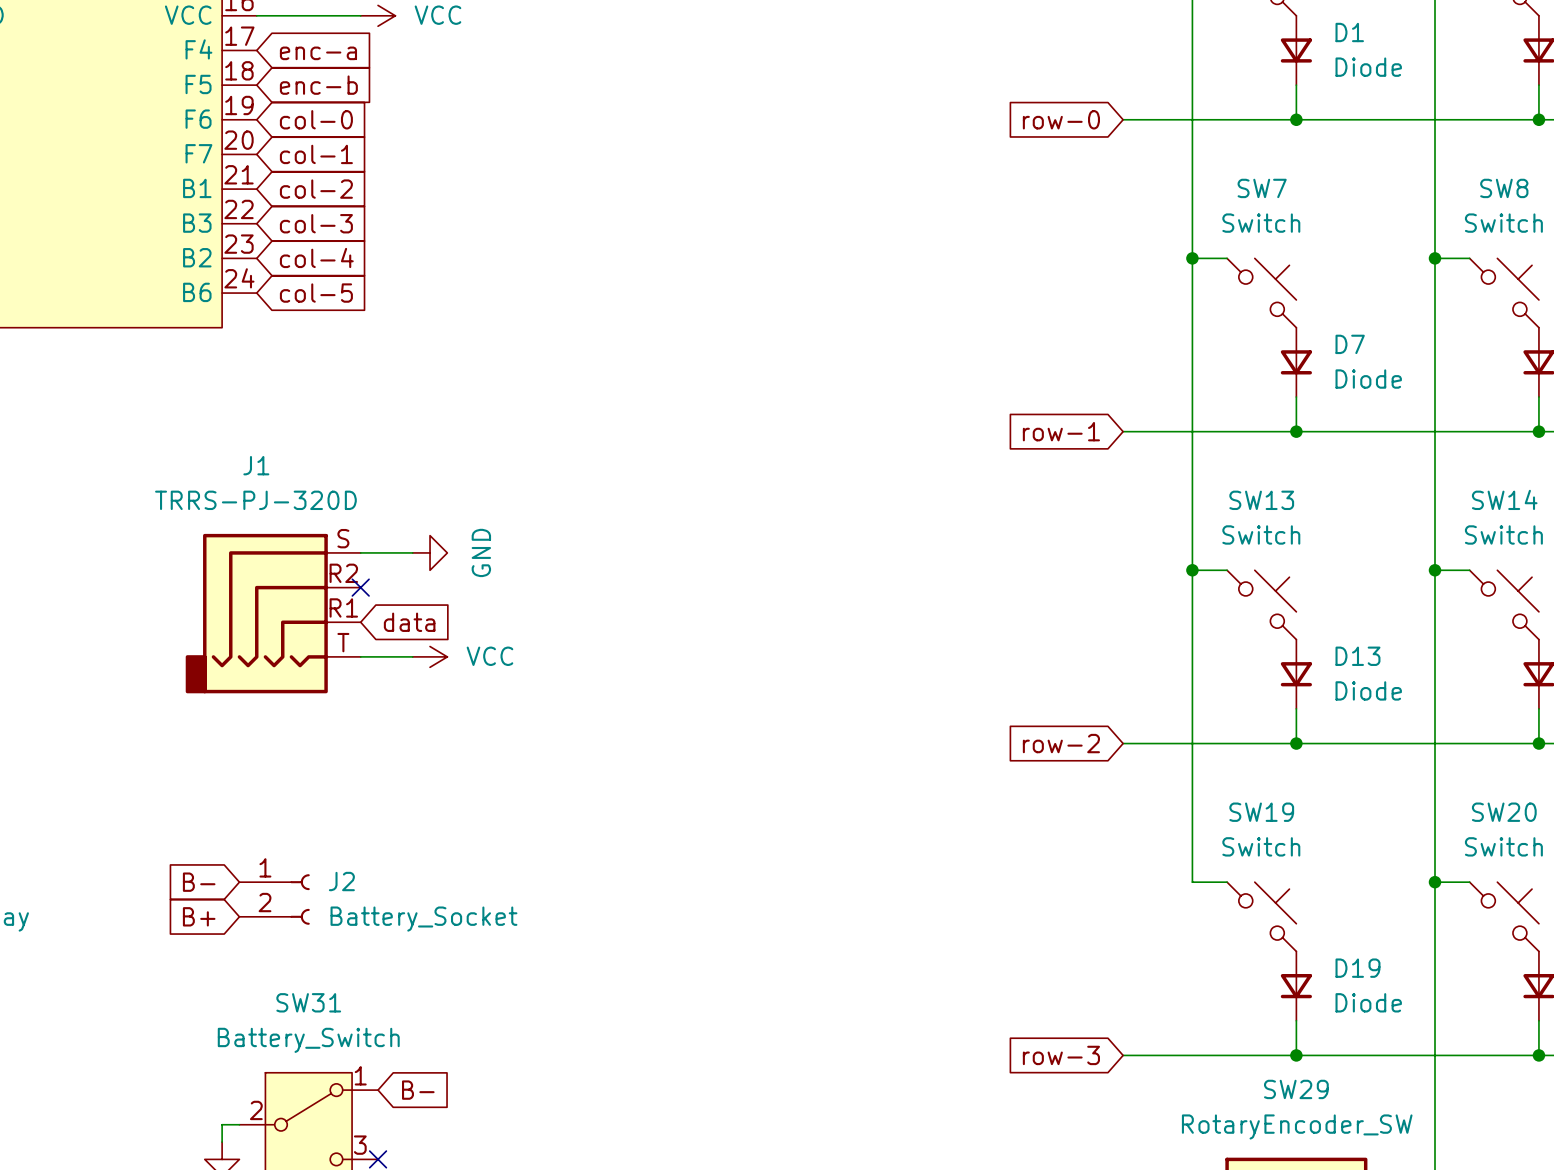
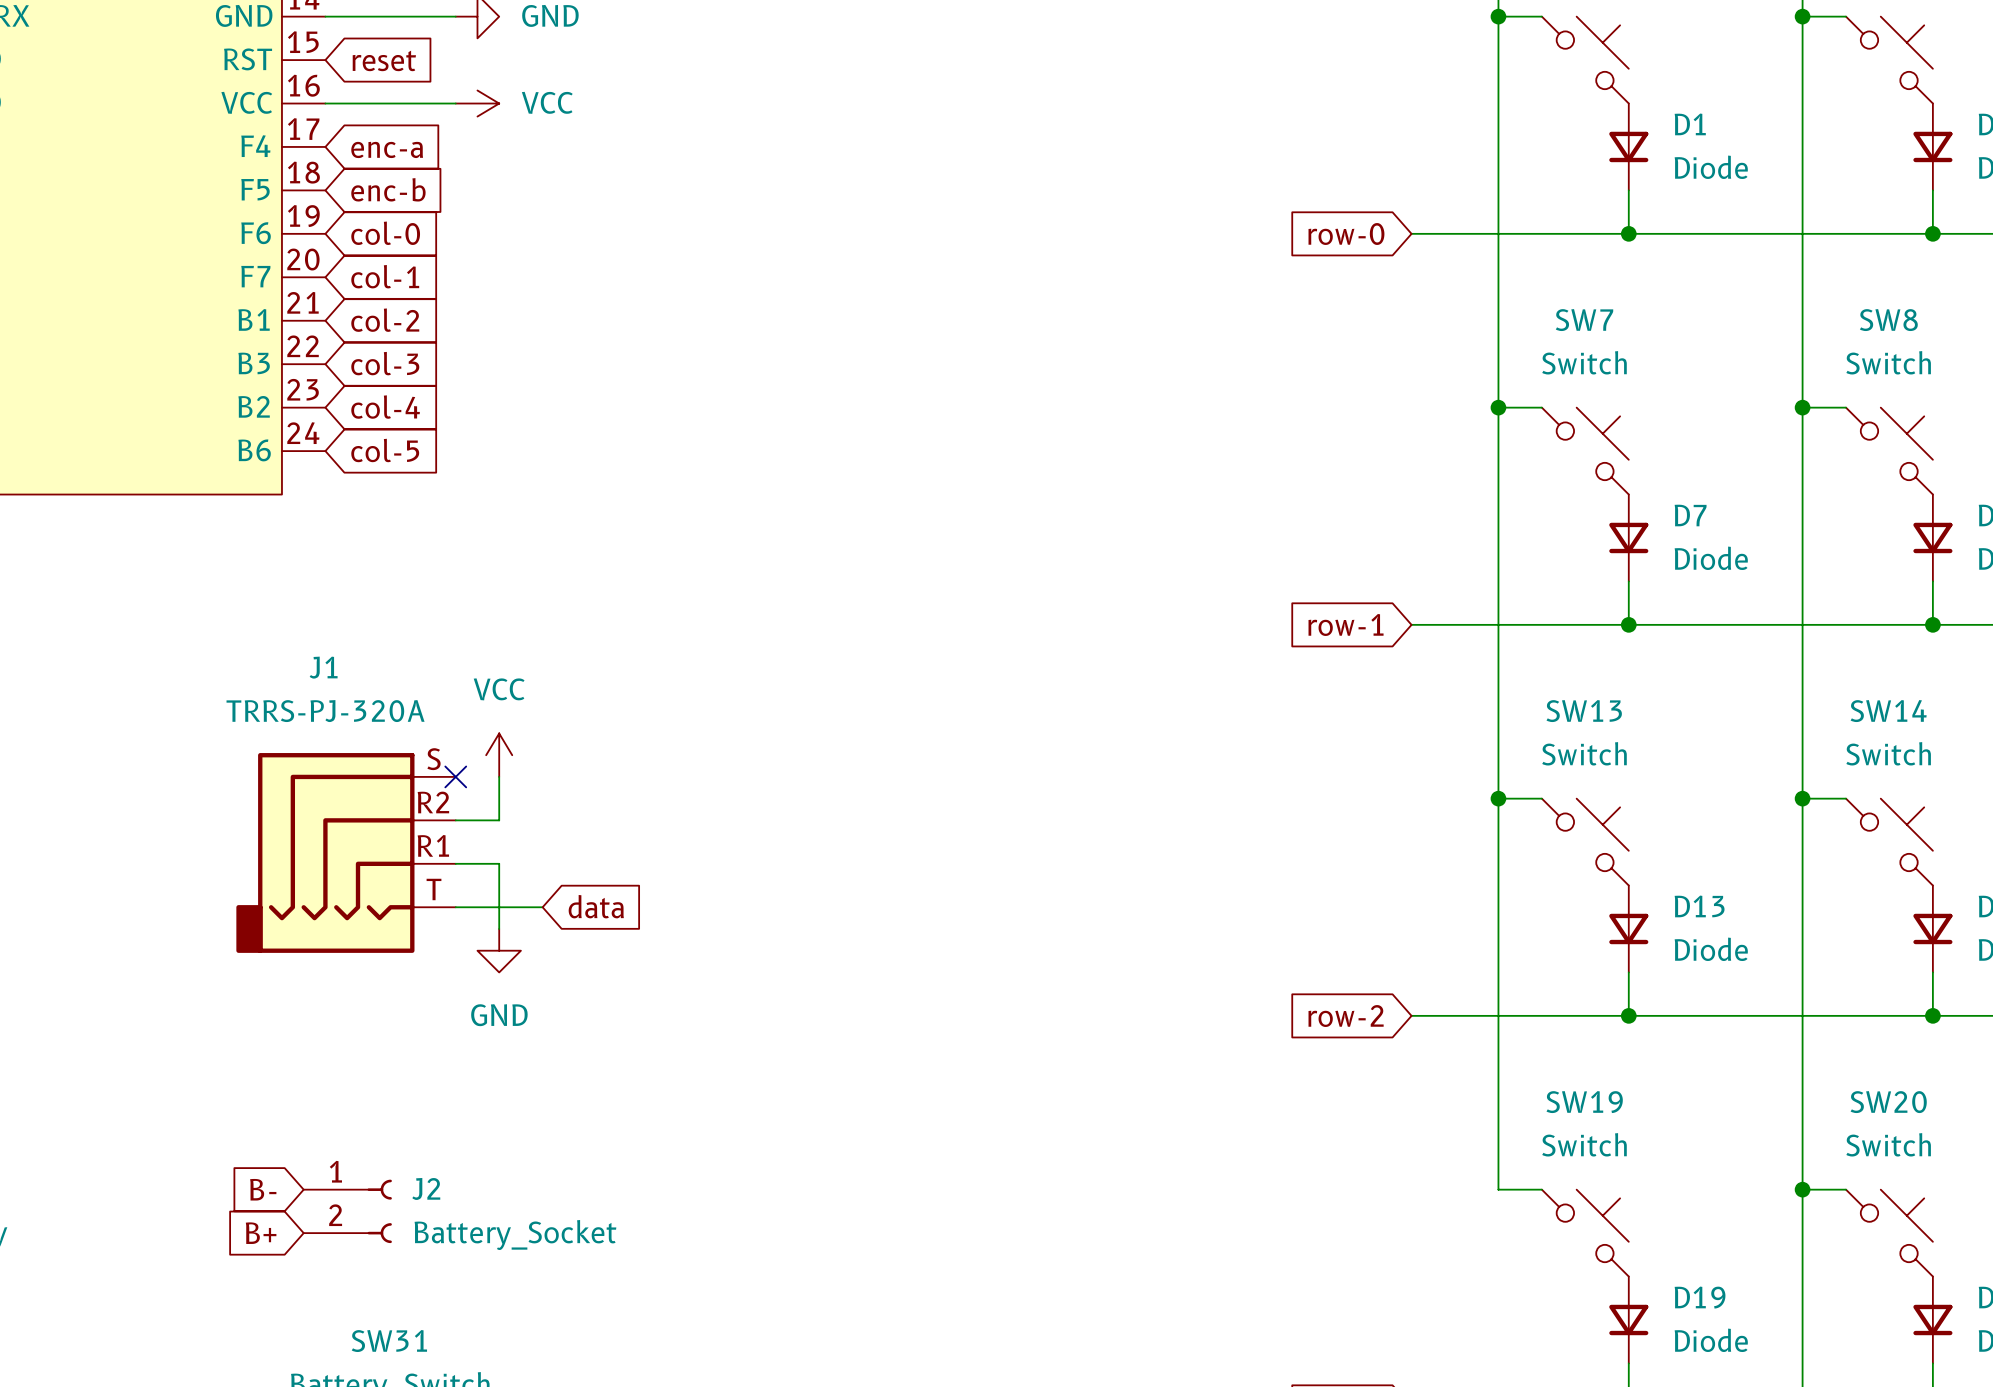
J1 value: TRRS-PJ-320D (255, 500) -> TRRS-PJ-320A (325, 711)
wire: (360, 552) (412, 552) -> none
wire: none -> (499, 776) (499, 820) (455, 820)
power symbol rotation: 0° (430, 552) -> 90° clockwise (499, 950)
power symbol position: GND (430, 552) -> GND (499, 950)
no-connect mark position: (360, 587) -> (455, 776)
wire: none -> (455, 863) (499, 863) (499, 928)
global label position: data (409, 622) -> data (596, 906)
power symbol rotation: 0° (430, 656) -> 90° counterclockwise (499, 755)
power symbol position: VCC (430, 656) -> VCC (499, 755)

